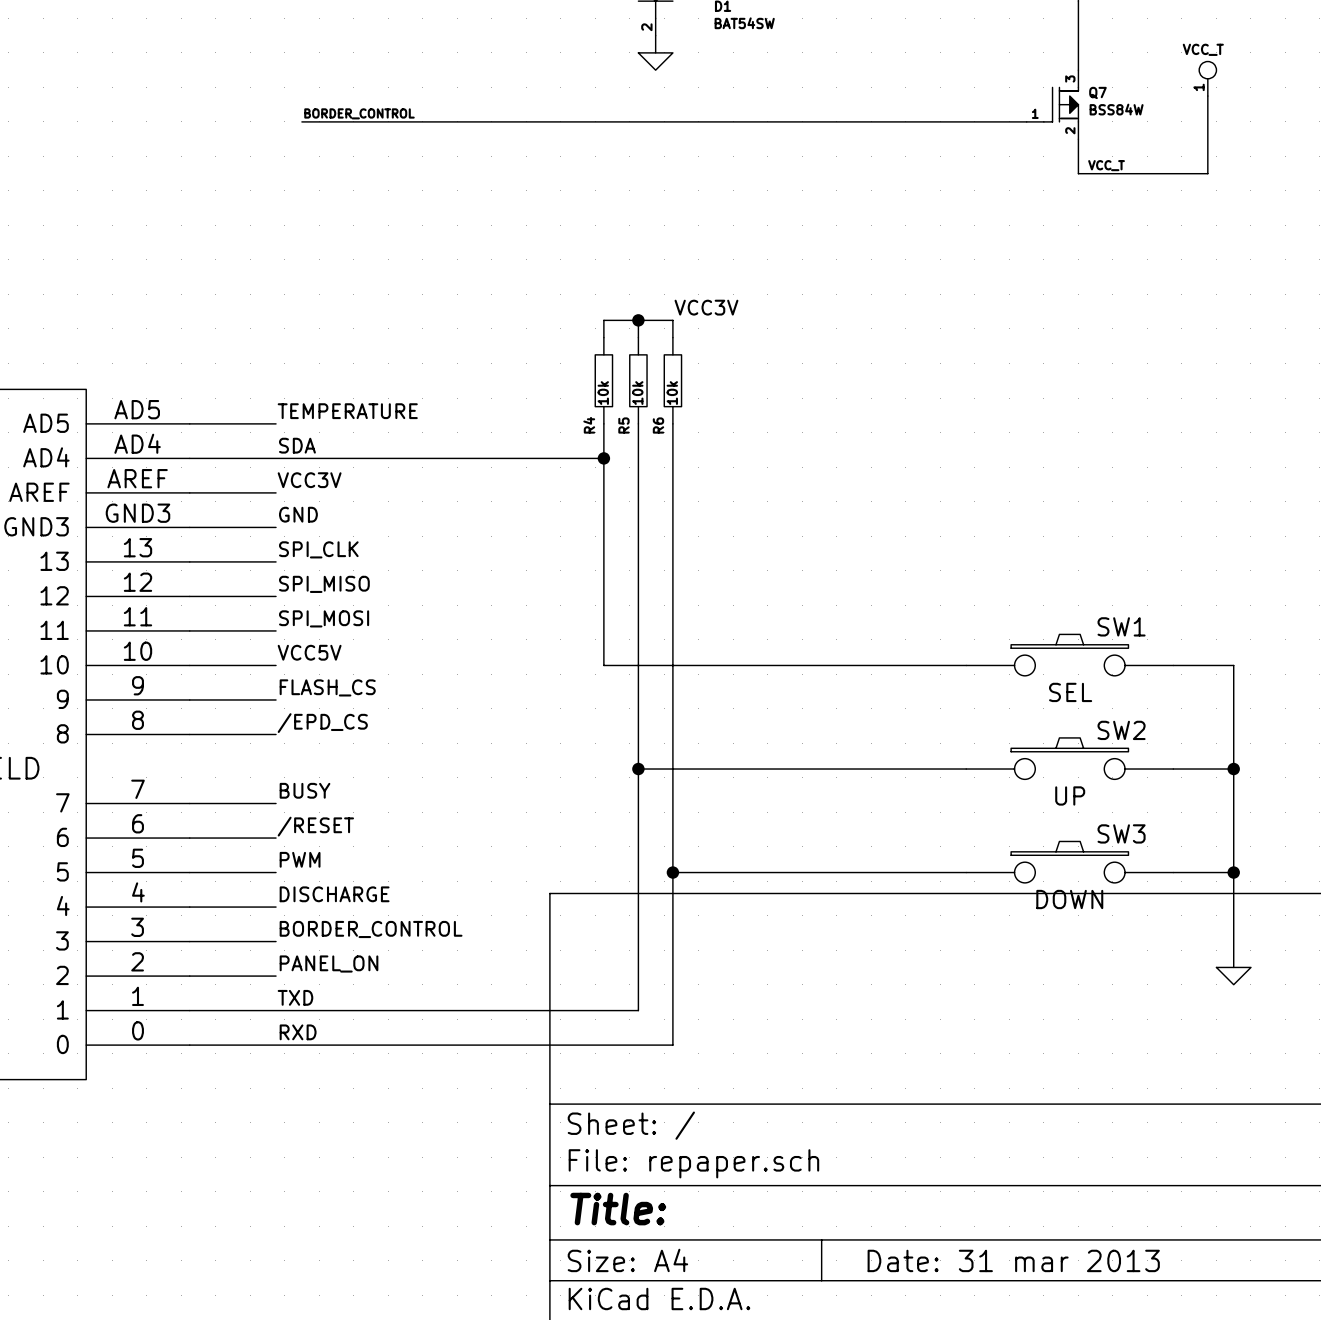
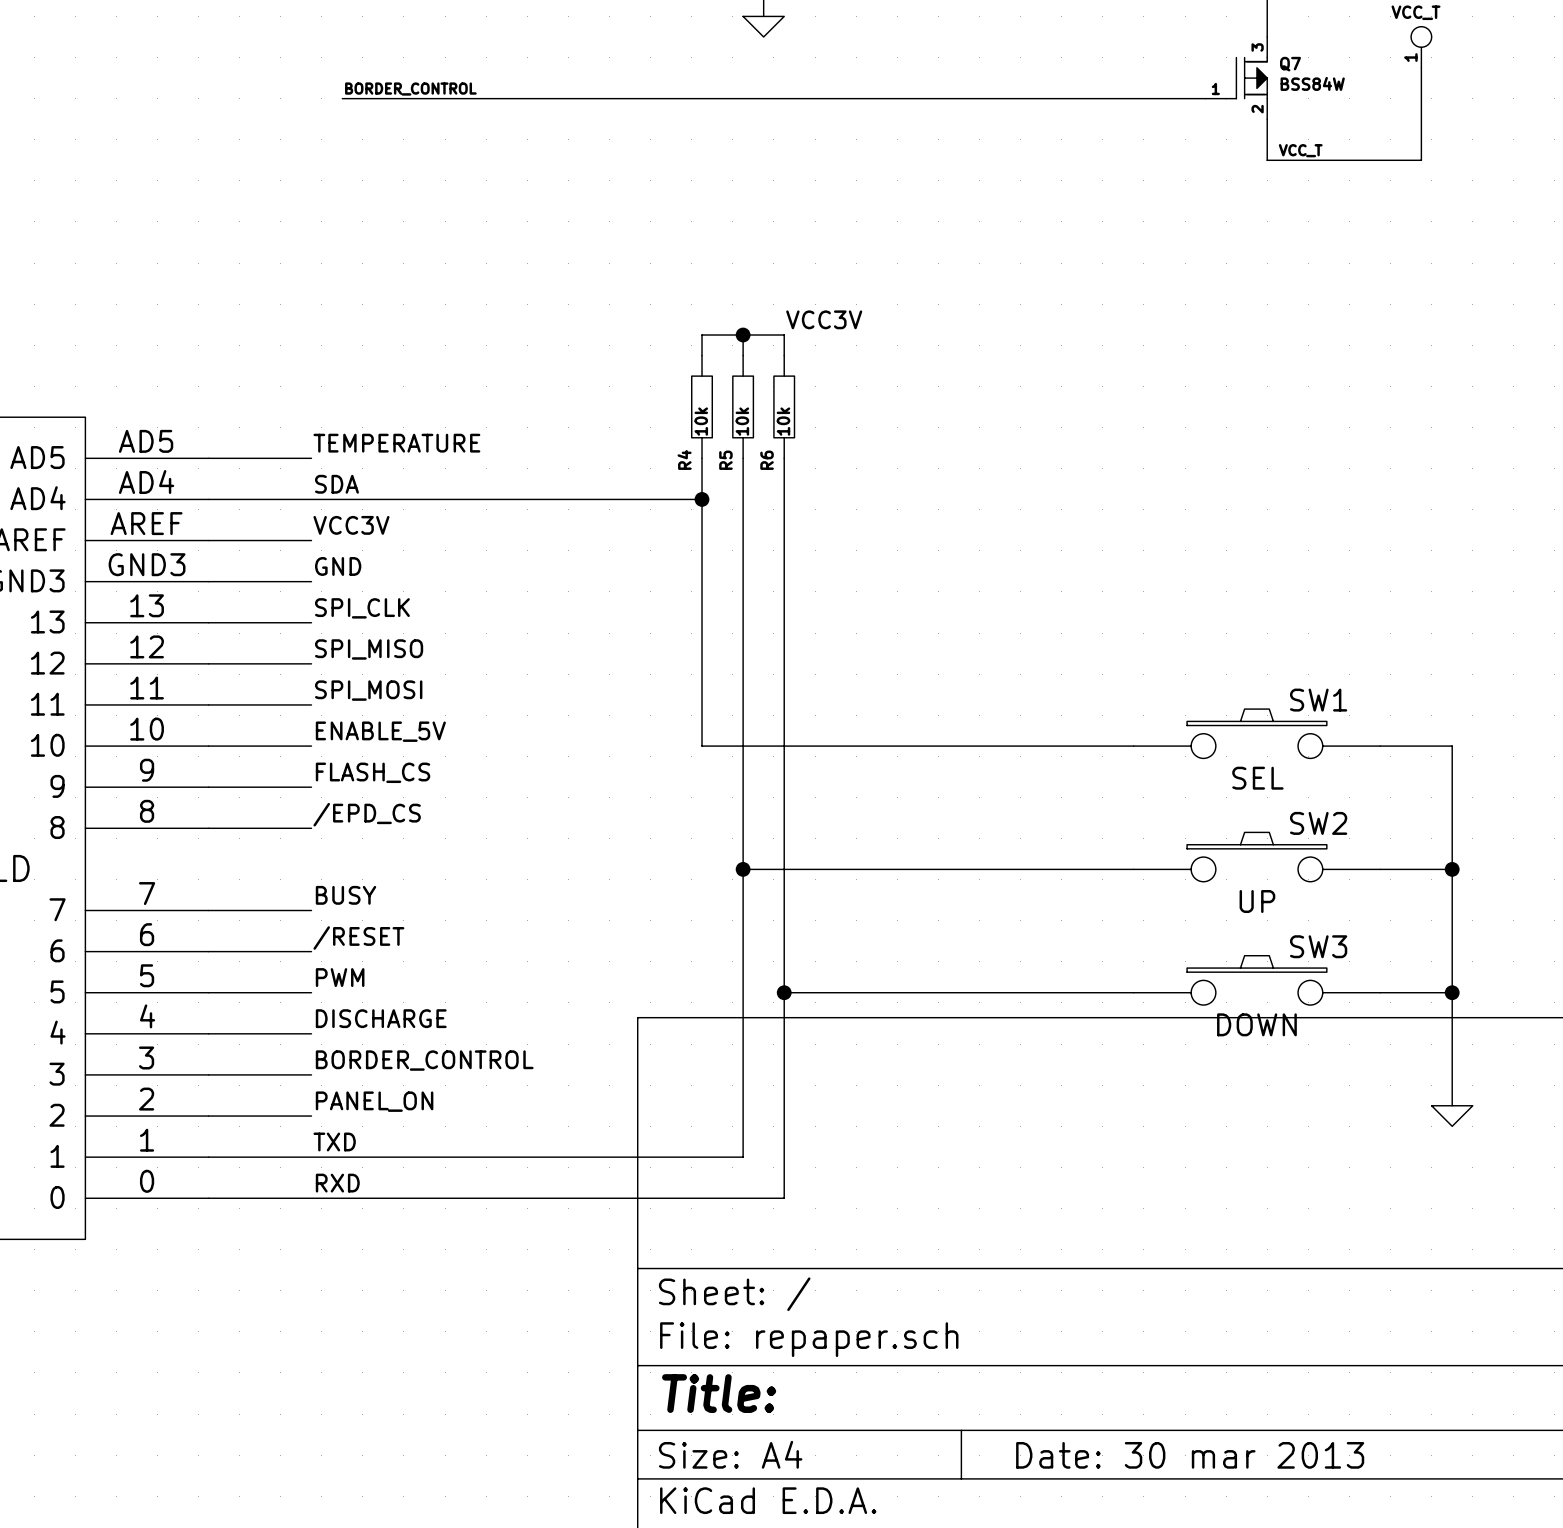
label: VCC5V (309, 652) -> ENABLE_5V (380, 731)
title block: Date: 31 mar 2013 (1013, 1260) -> Date: 30 mar 2013 (1190, 1455)

